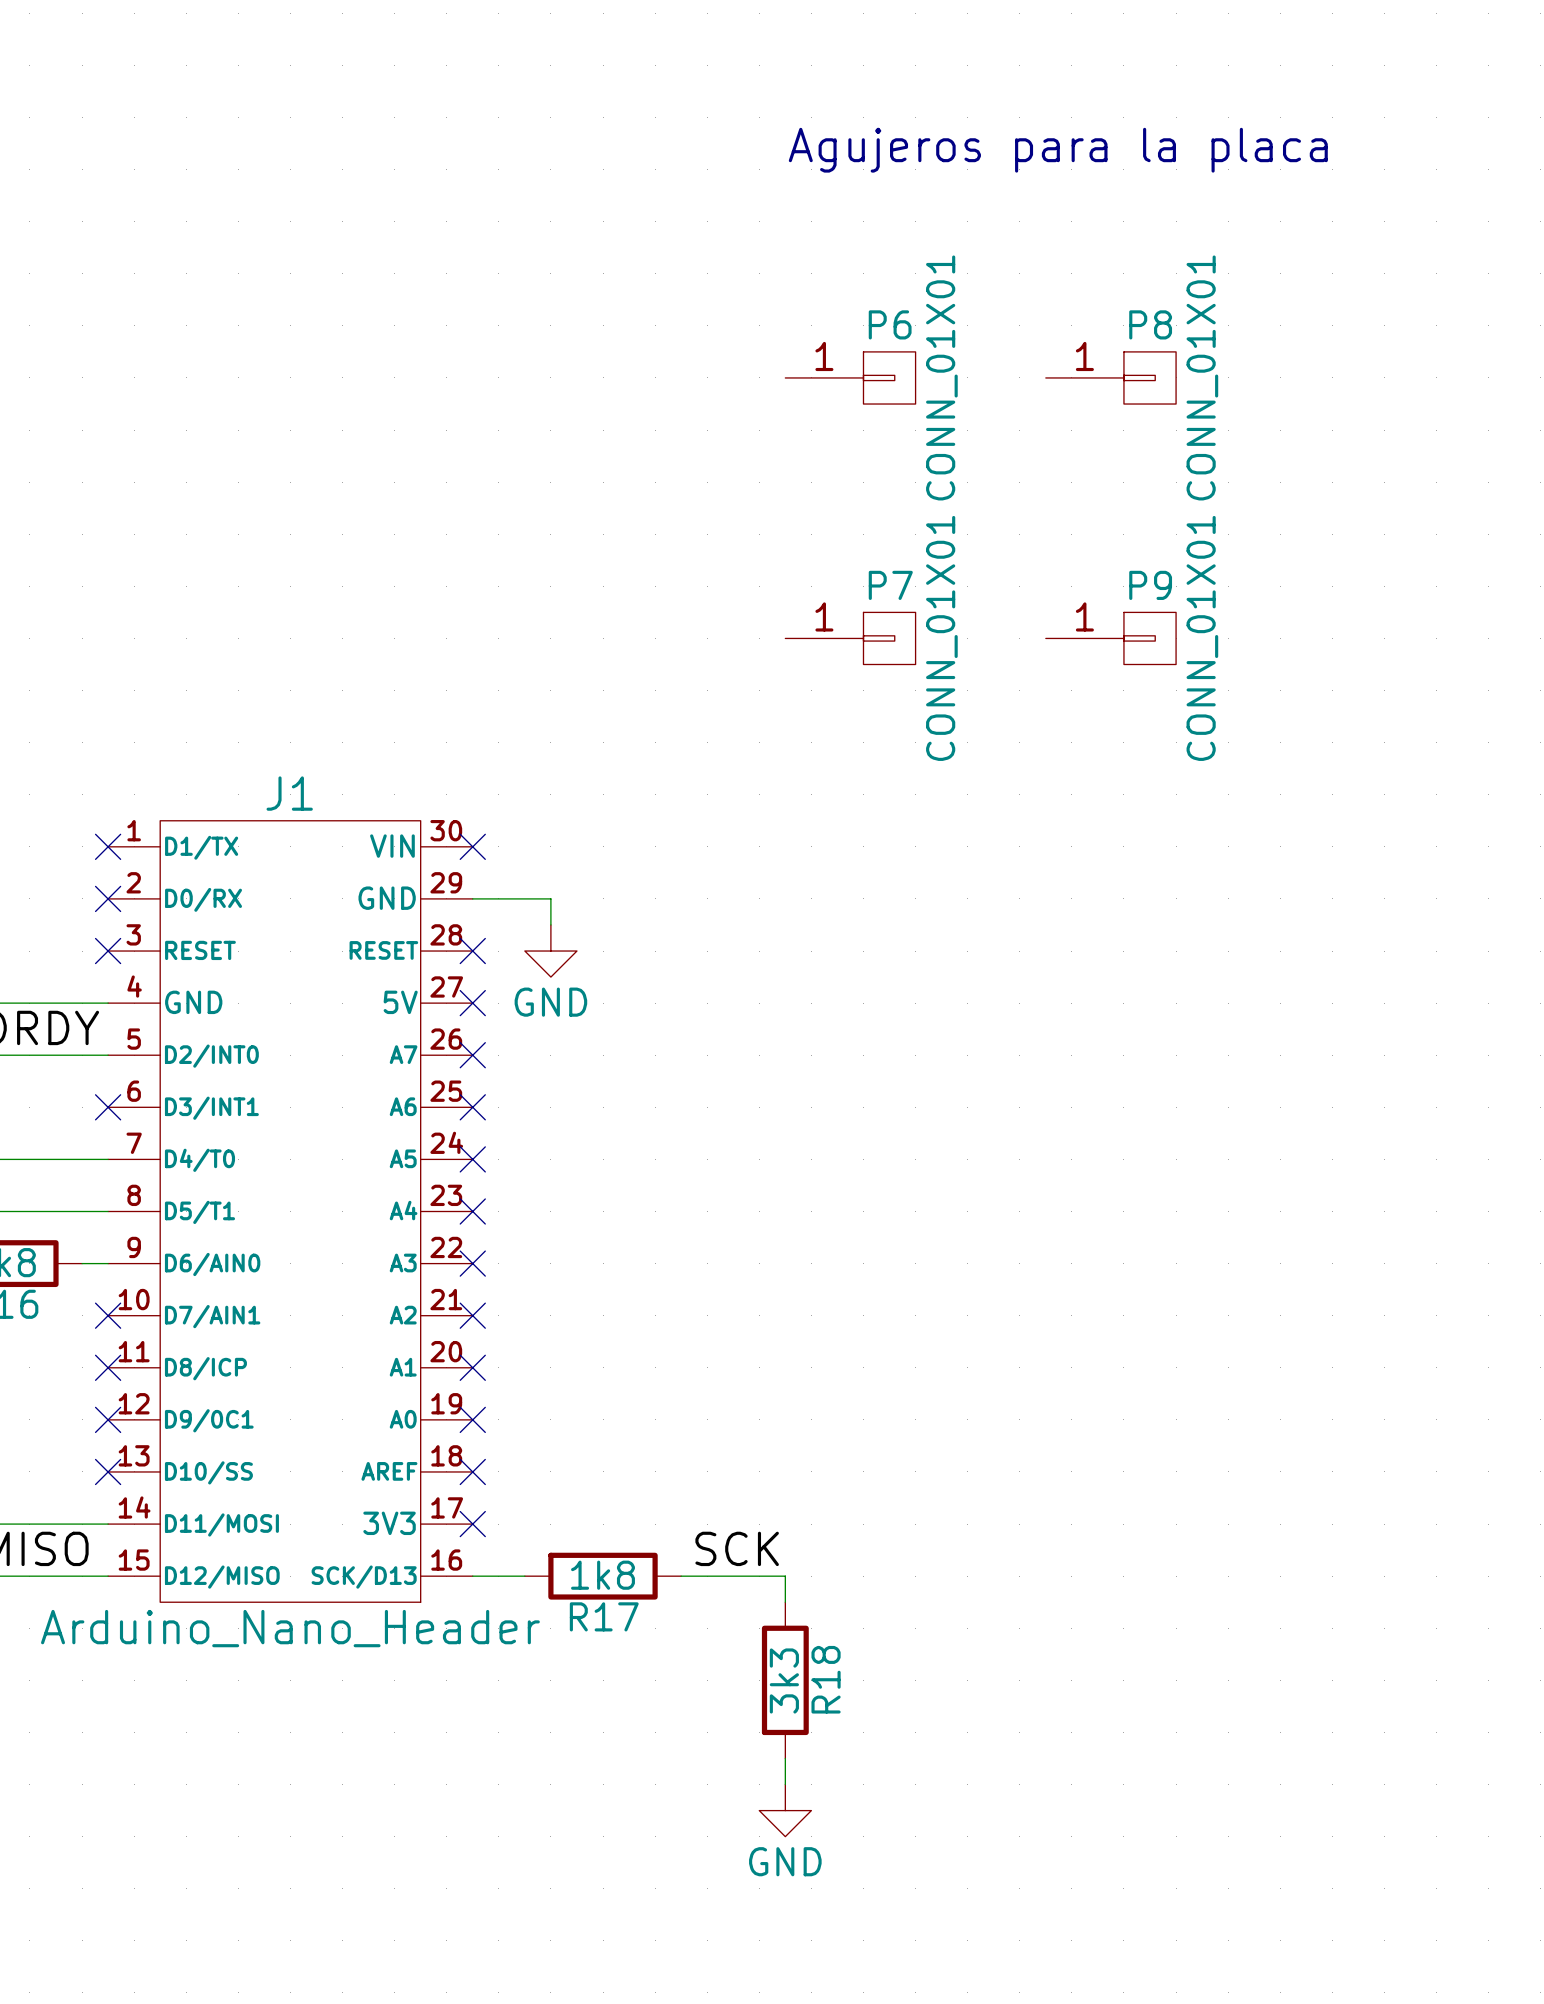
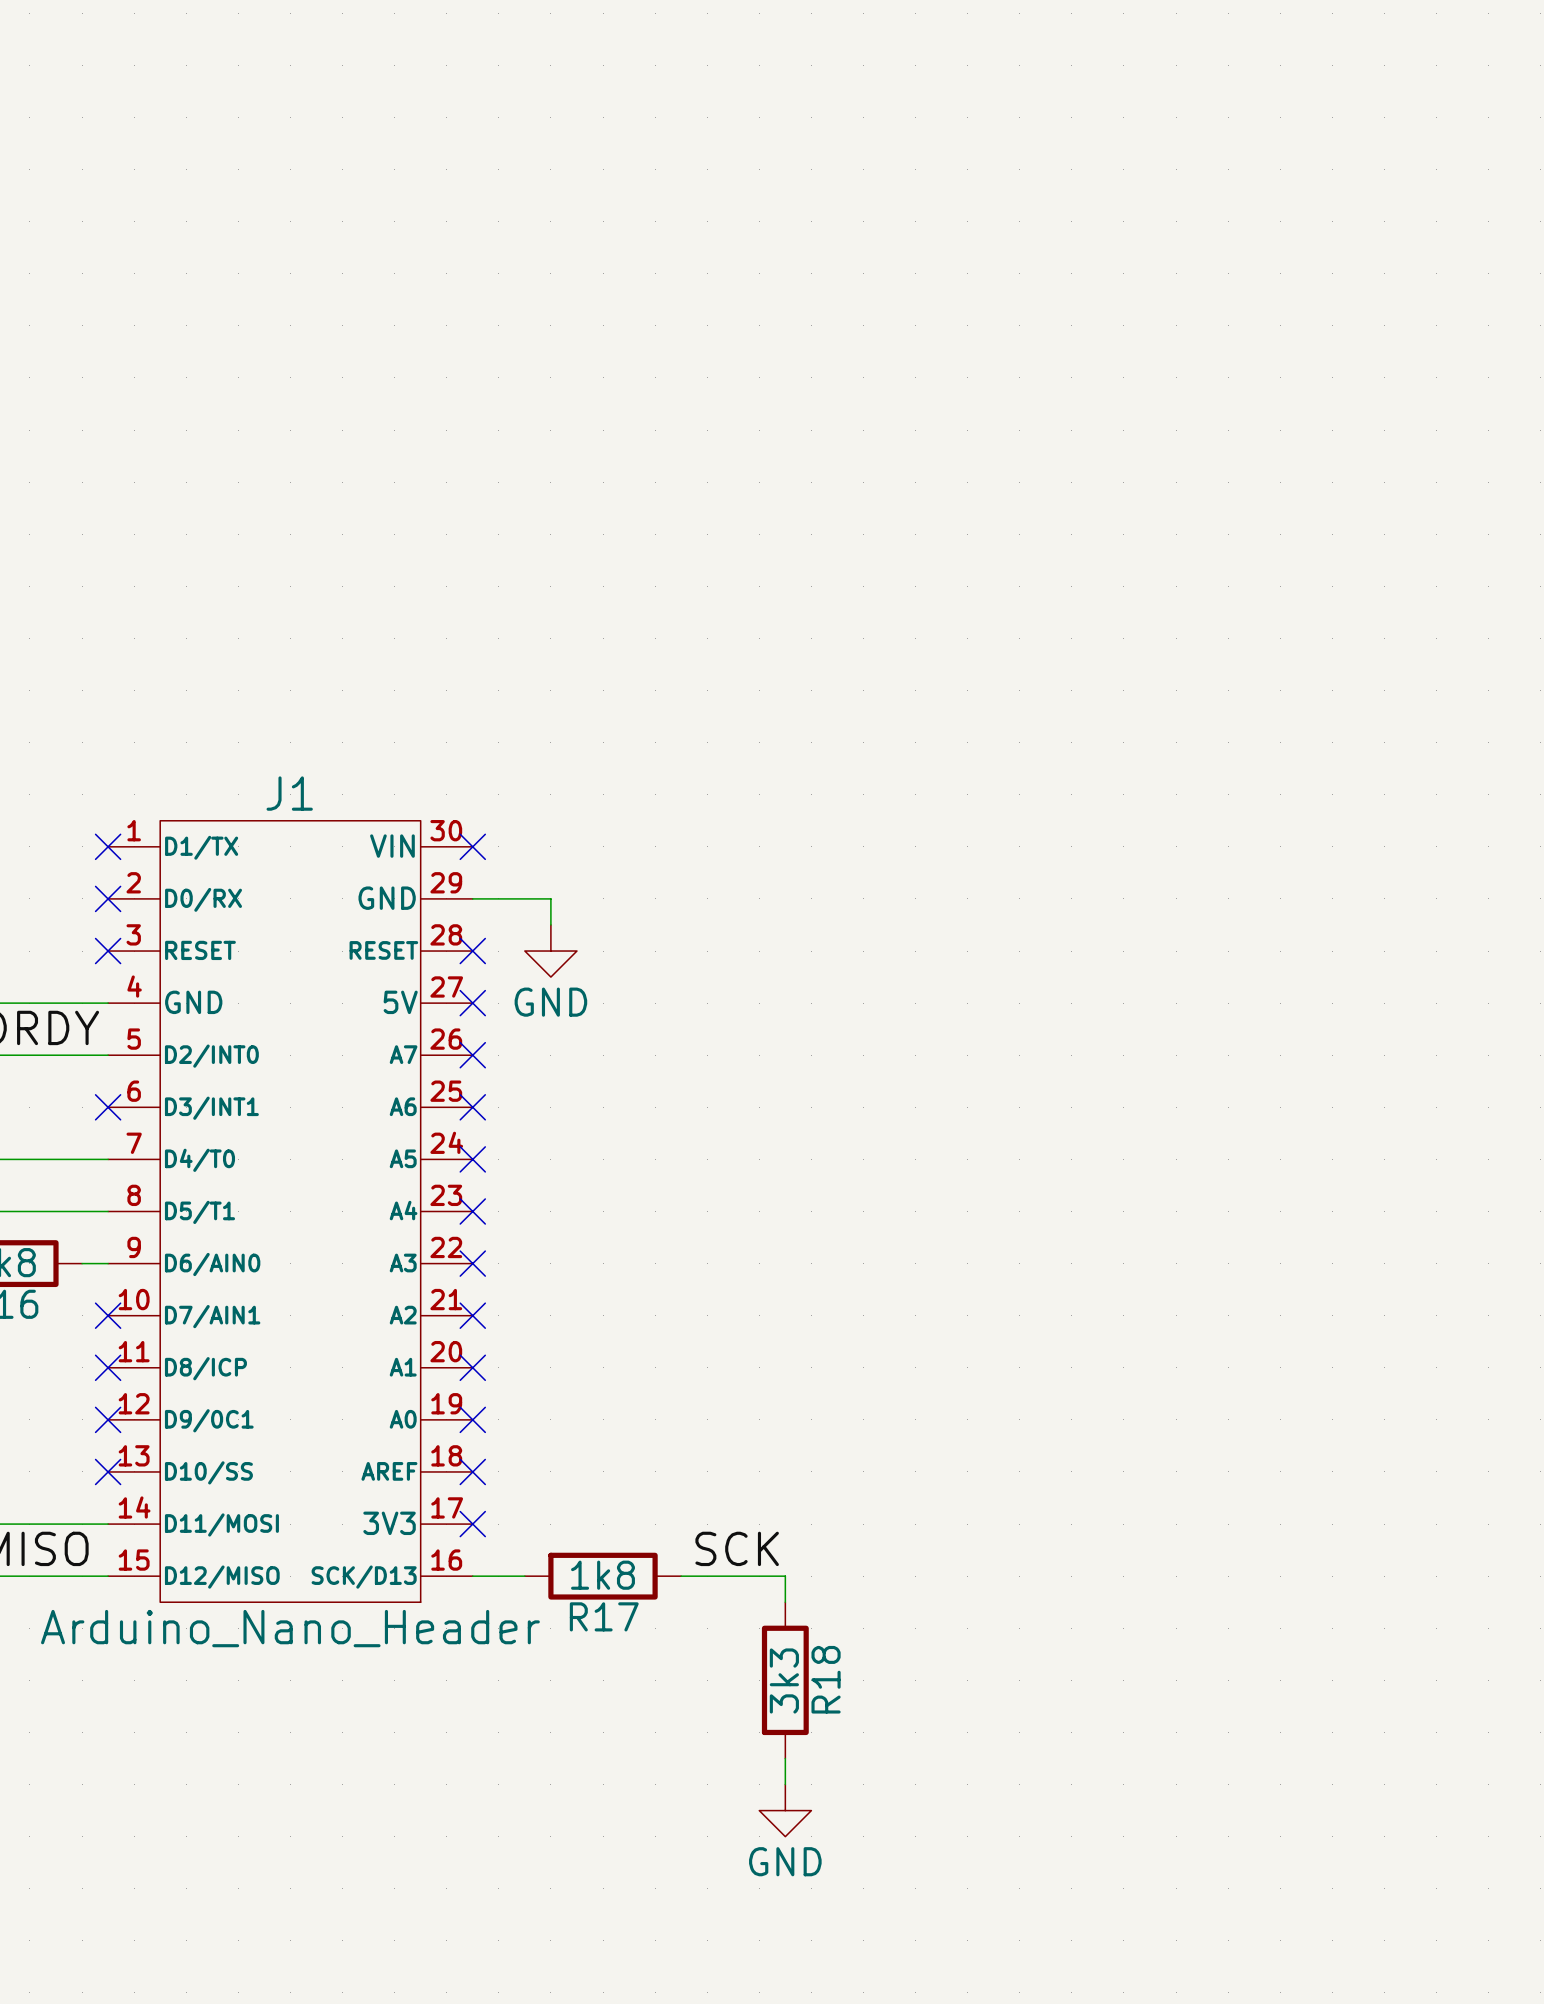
text: Agujeros para la placa (1058, 150) -> none
P6: CONN_01X01 (850, 377) -> none
P8: CONN_01X01 (1110, 377) -> none
P7: CONN_01X01 (850, 638) -> none
P9: CONN_01X01 (1110, 638) -> none

